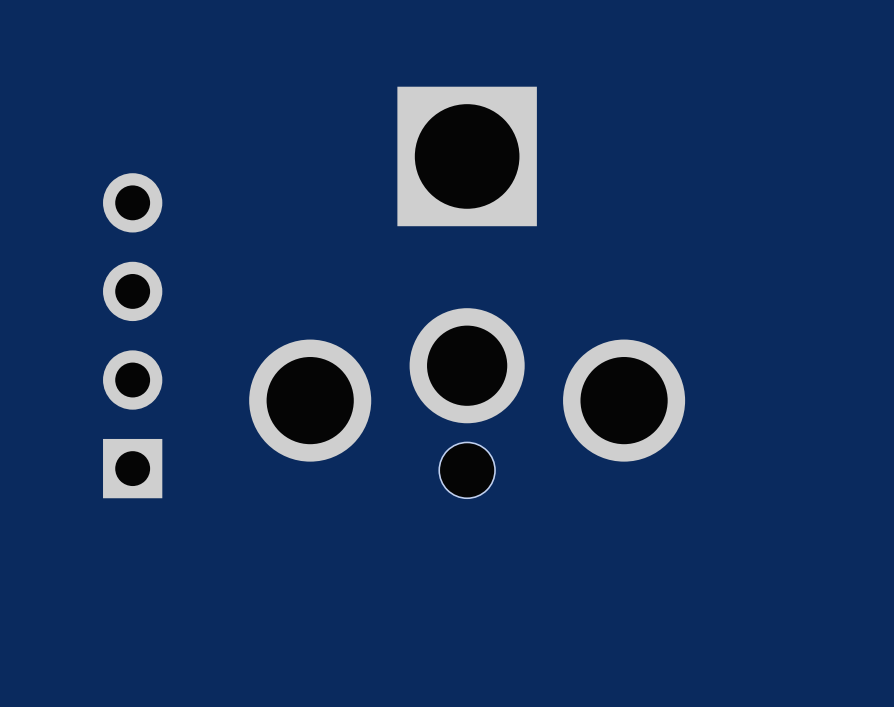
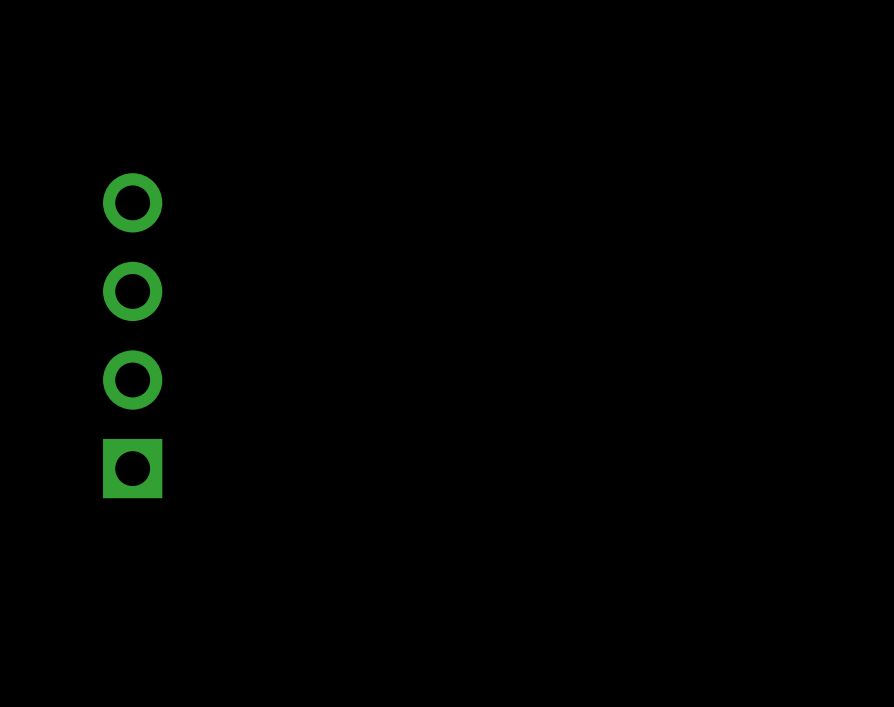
part: (467, 292) -> none

